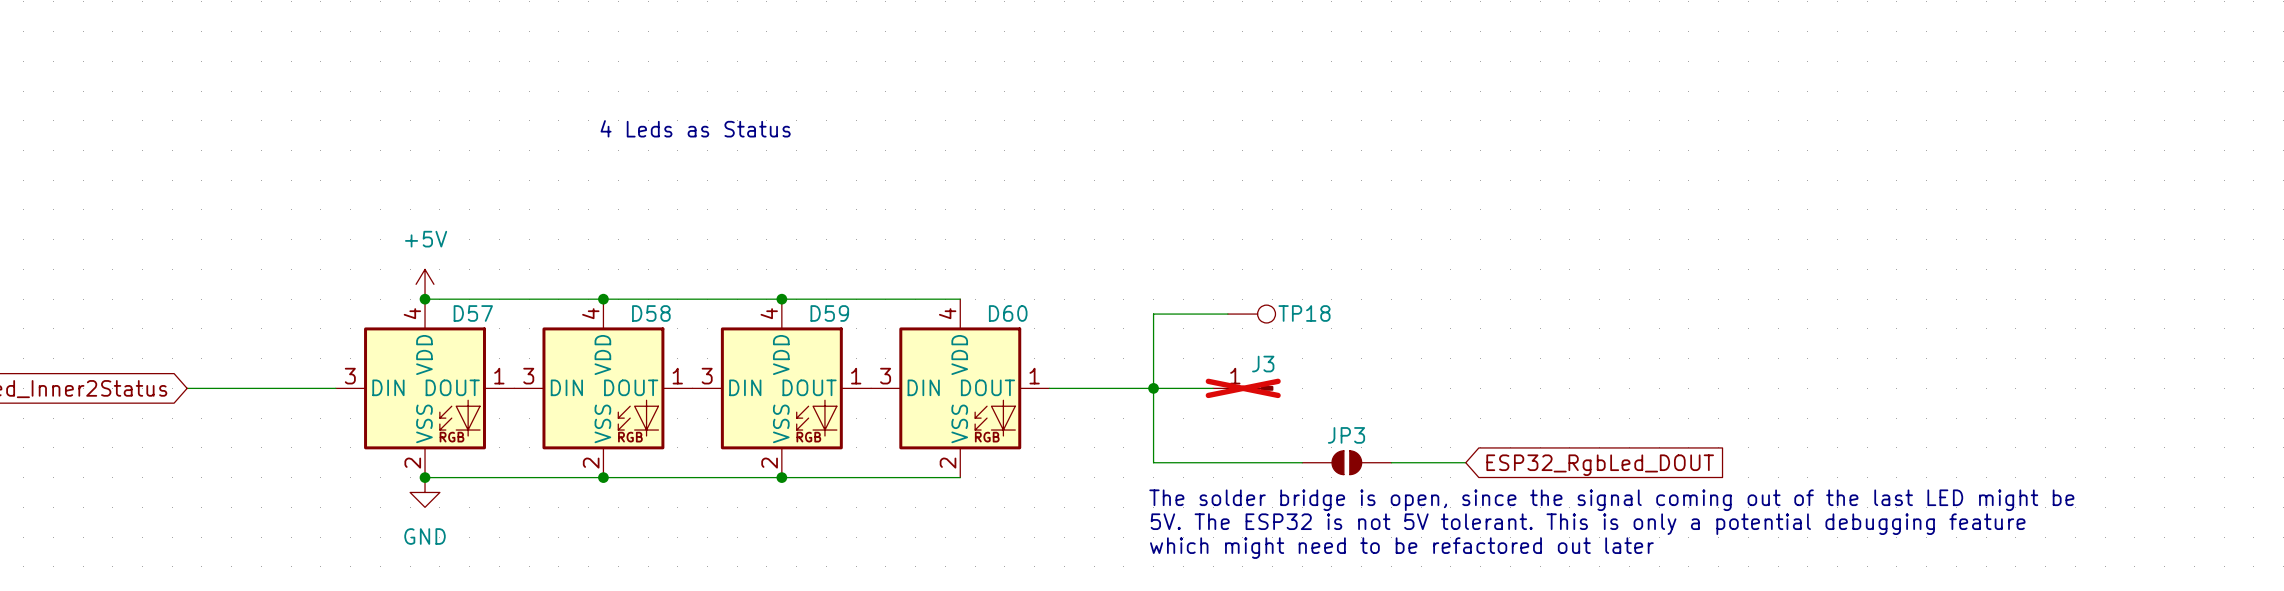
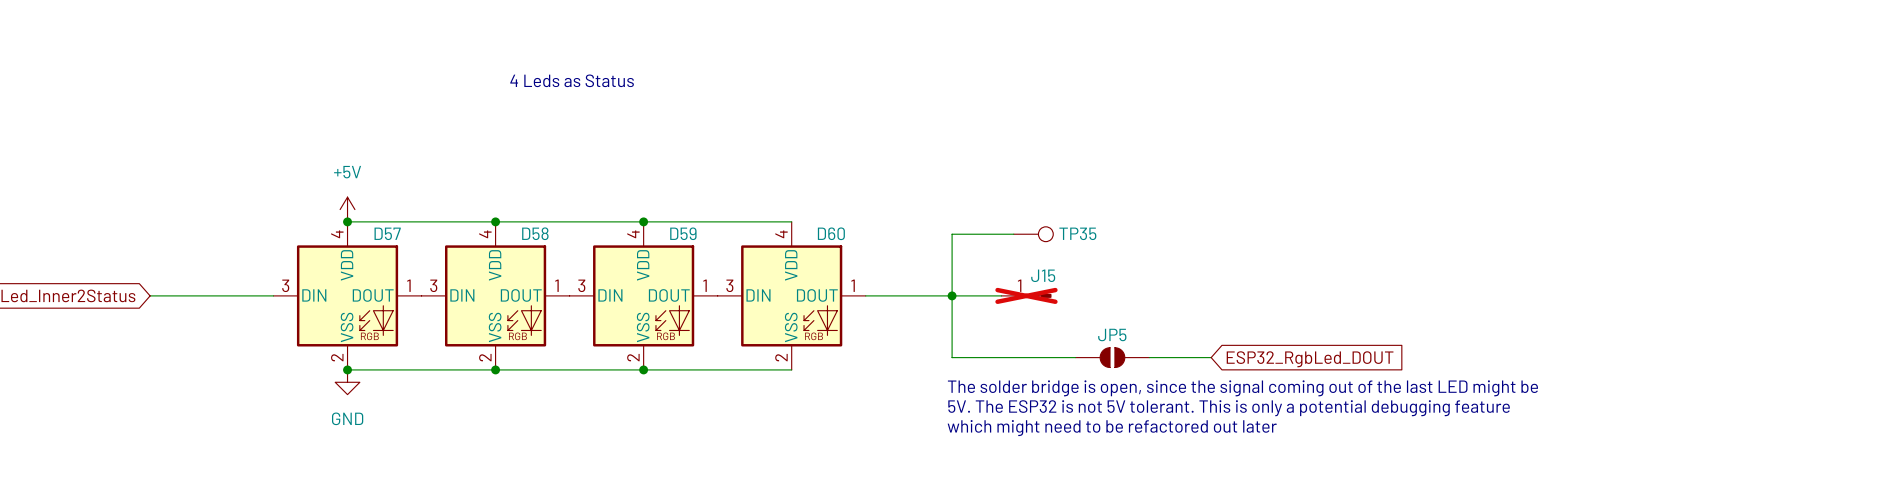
TP18 name: TP18 (1304, 313) -> TP35 (1077, 233)
J3 name: J3 (1263, 364) -> J15 (1043, 275)
JP3 name: JP3 (1346, 435) -> JP5 (1112, 335)

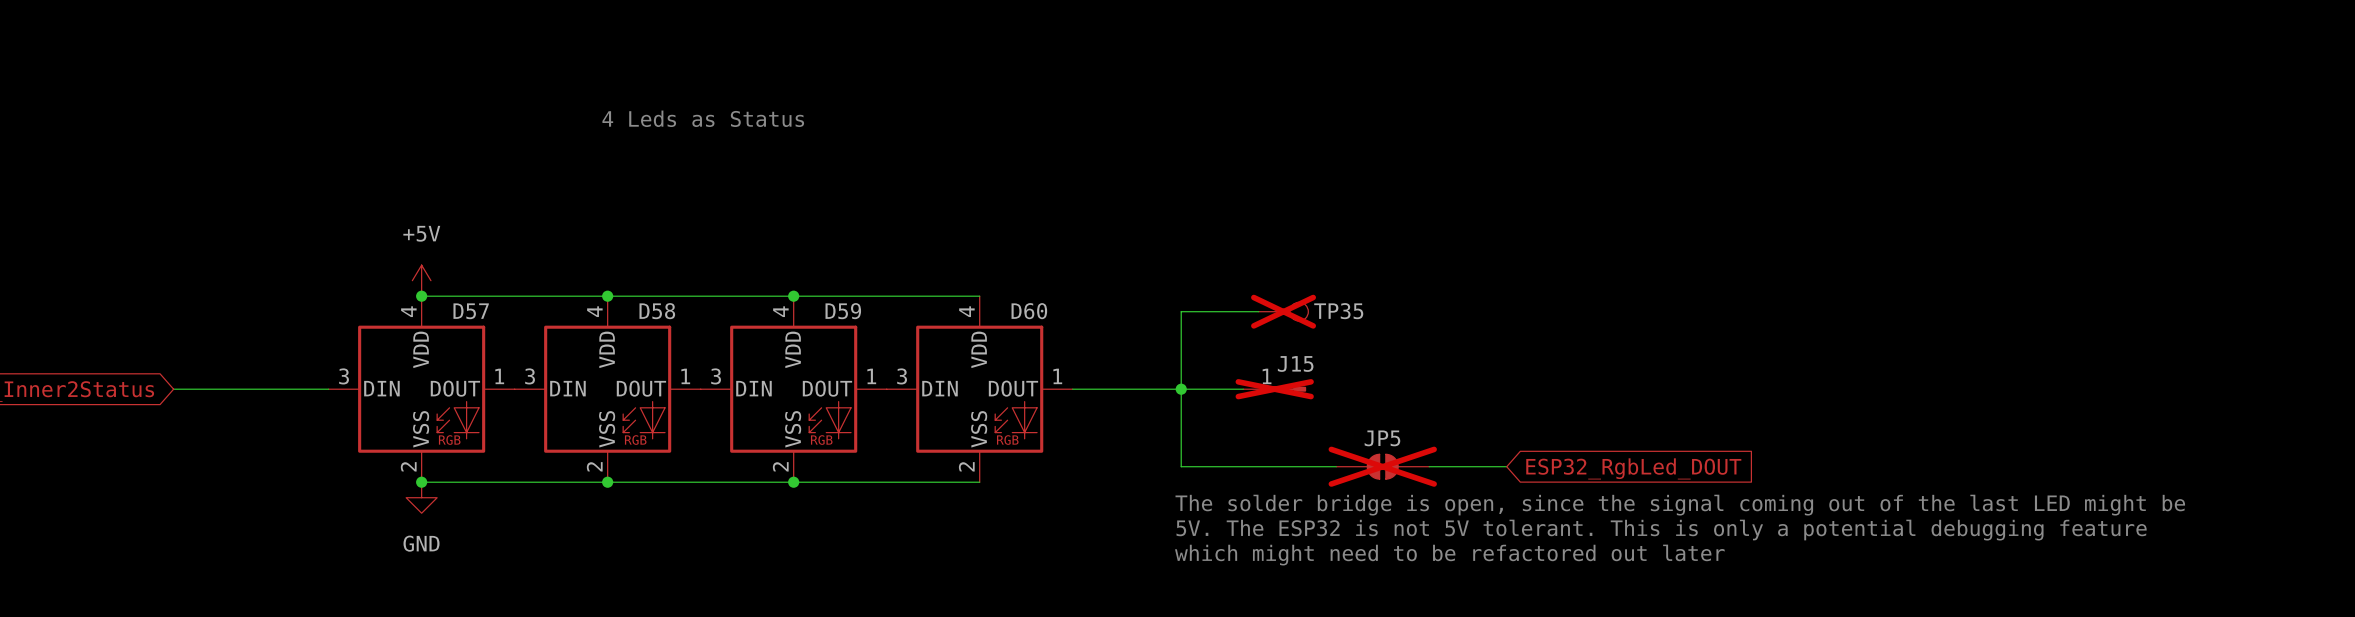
TP35 do-not-place cross: none -> (1283, 311)
JP5 do-not-place cross: none -> (1382, 466)

